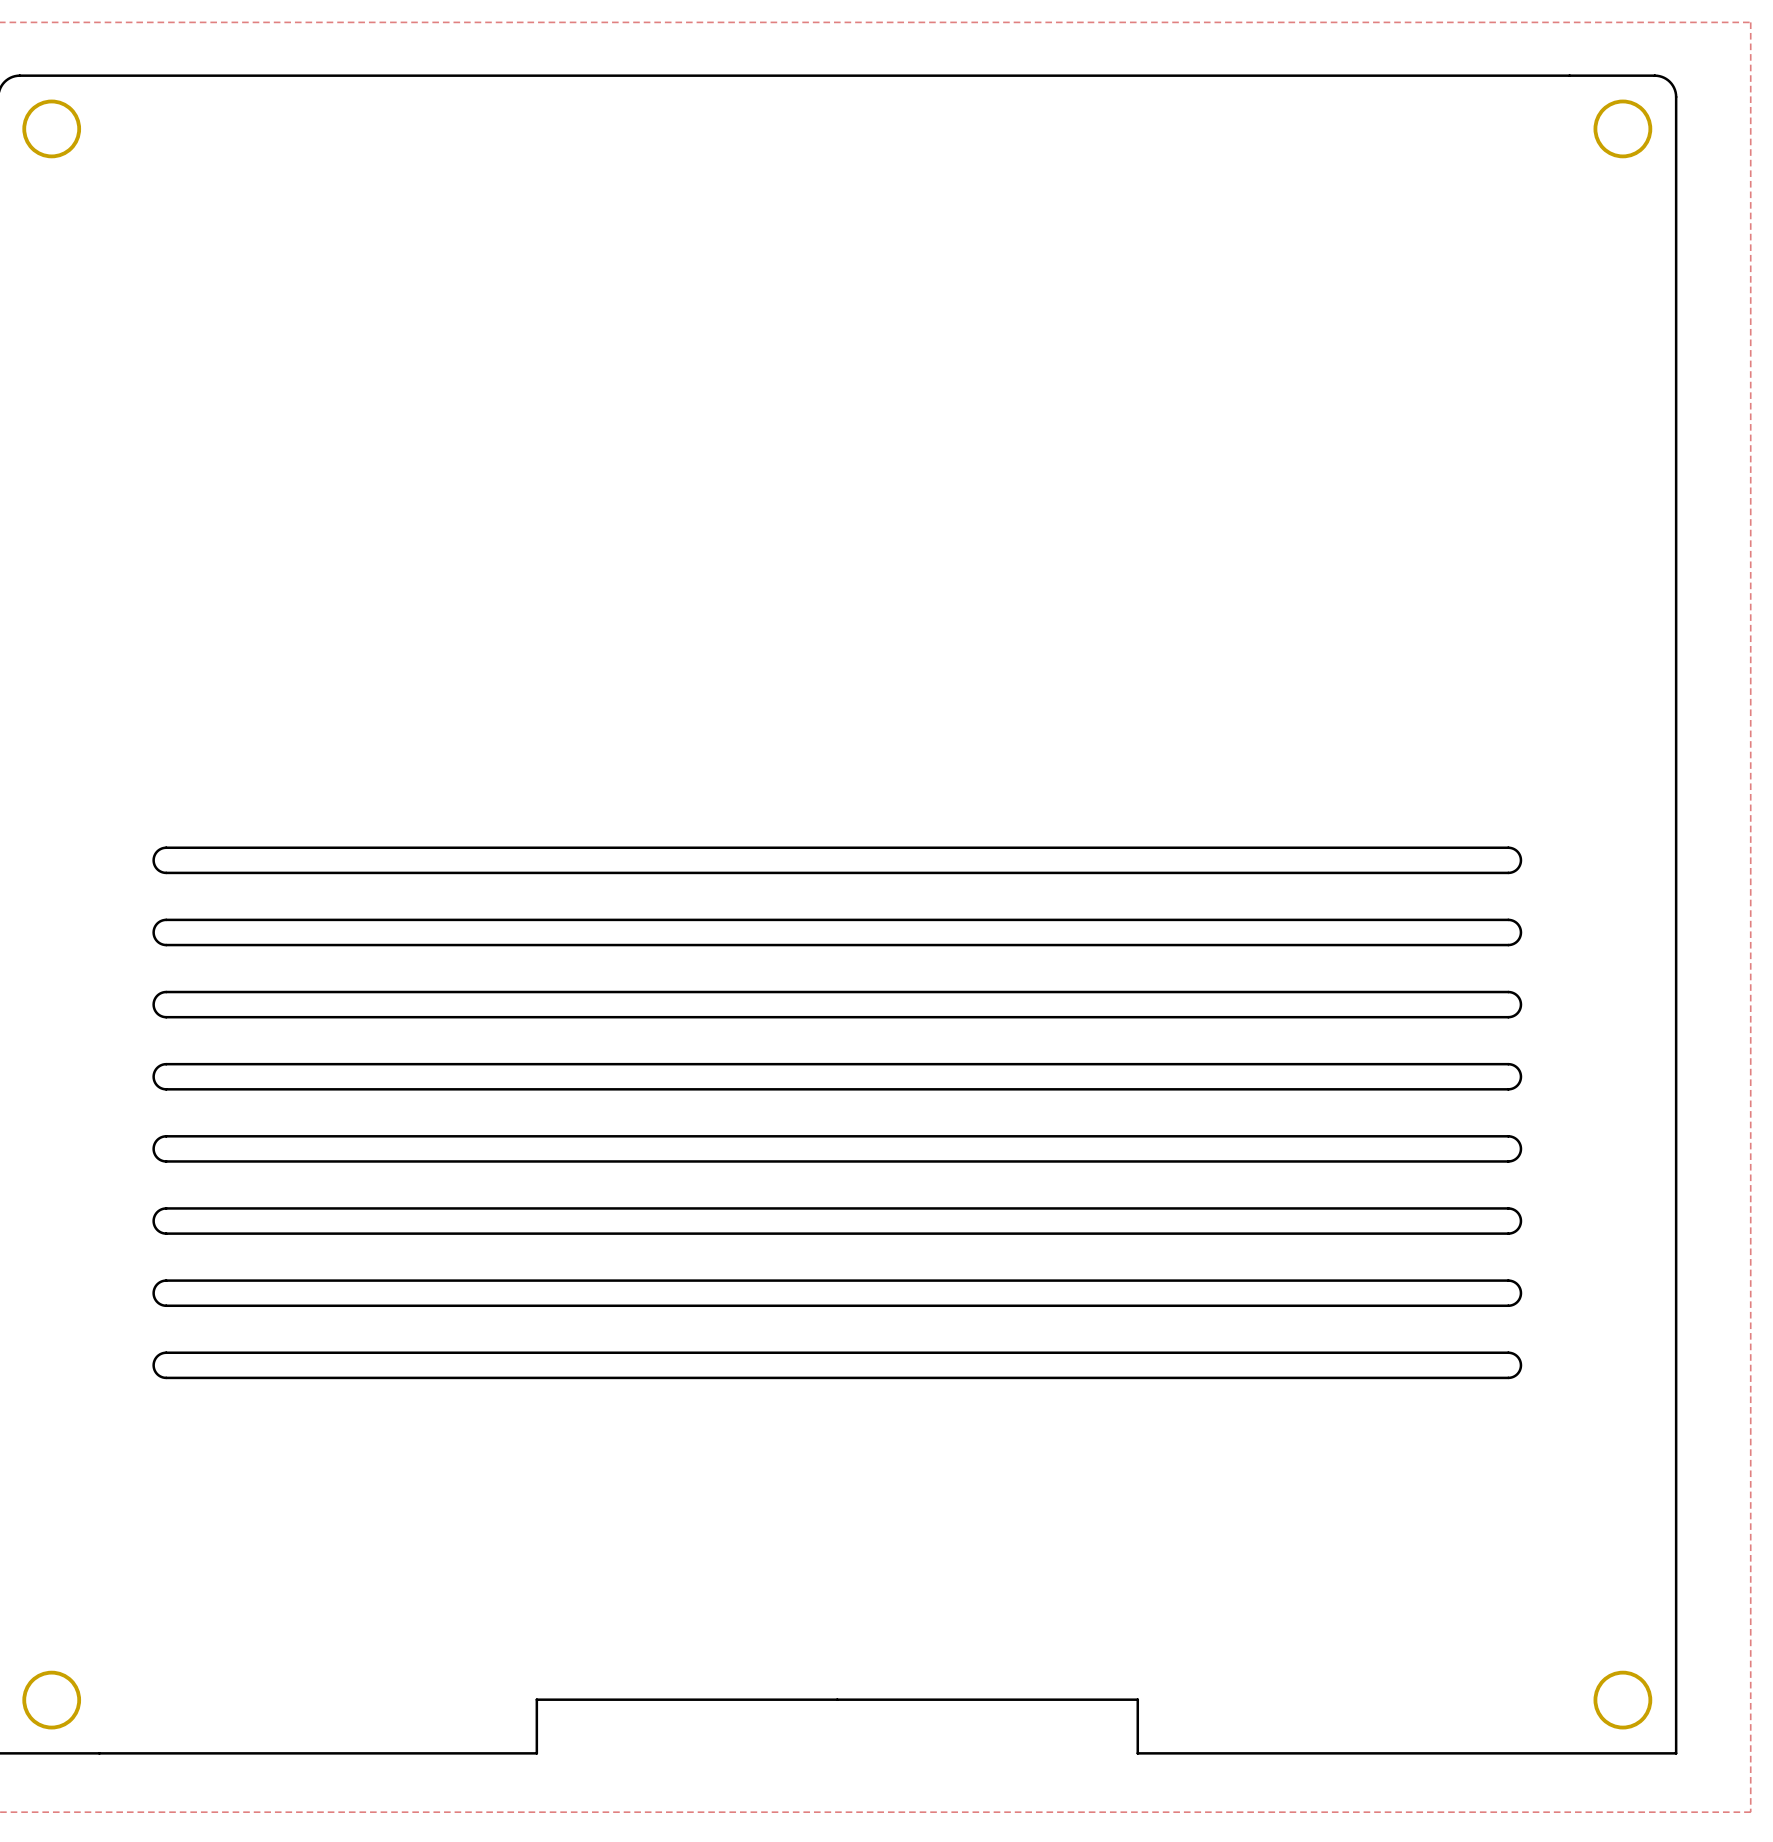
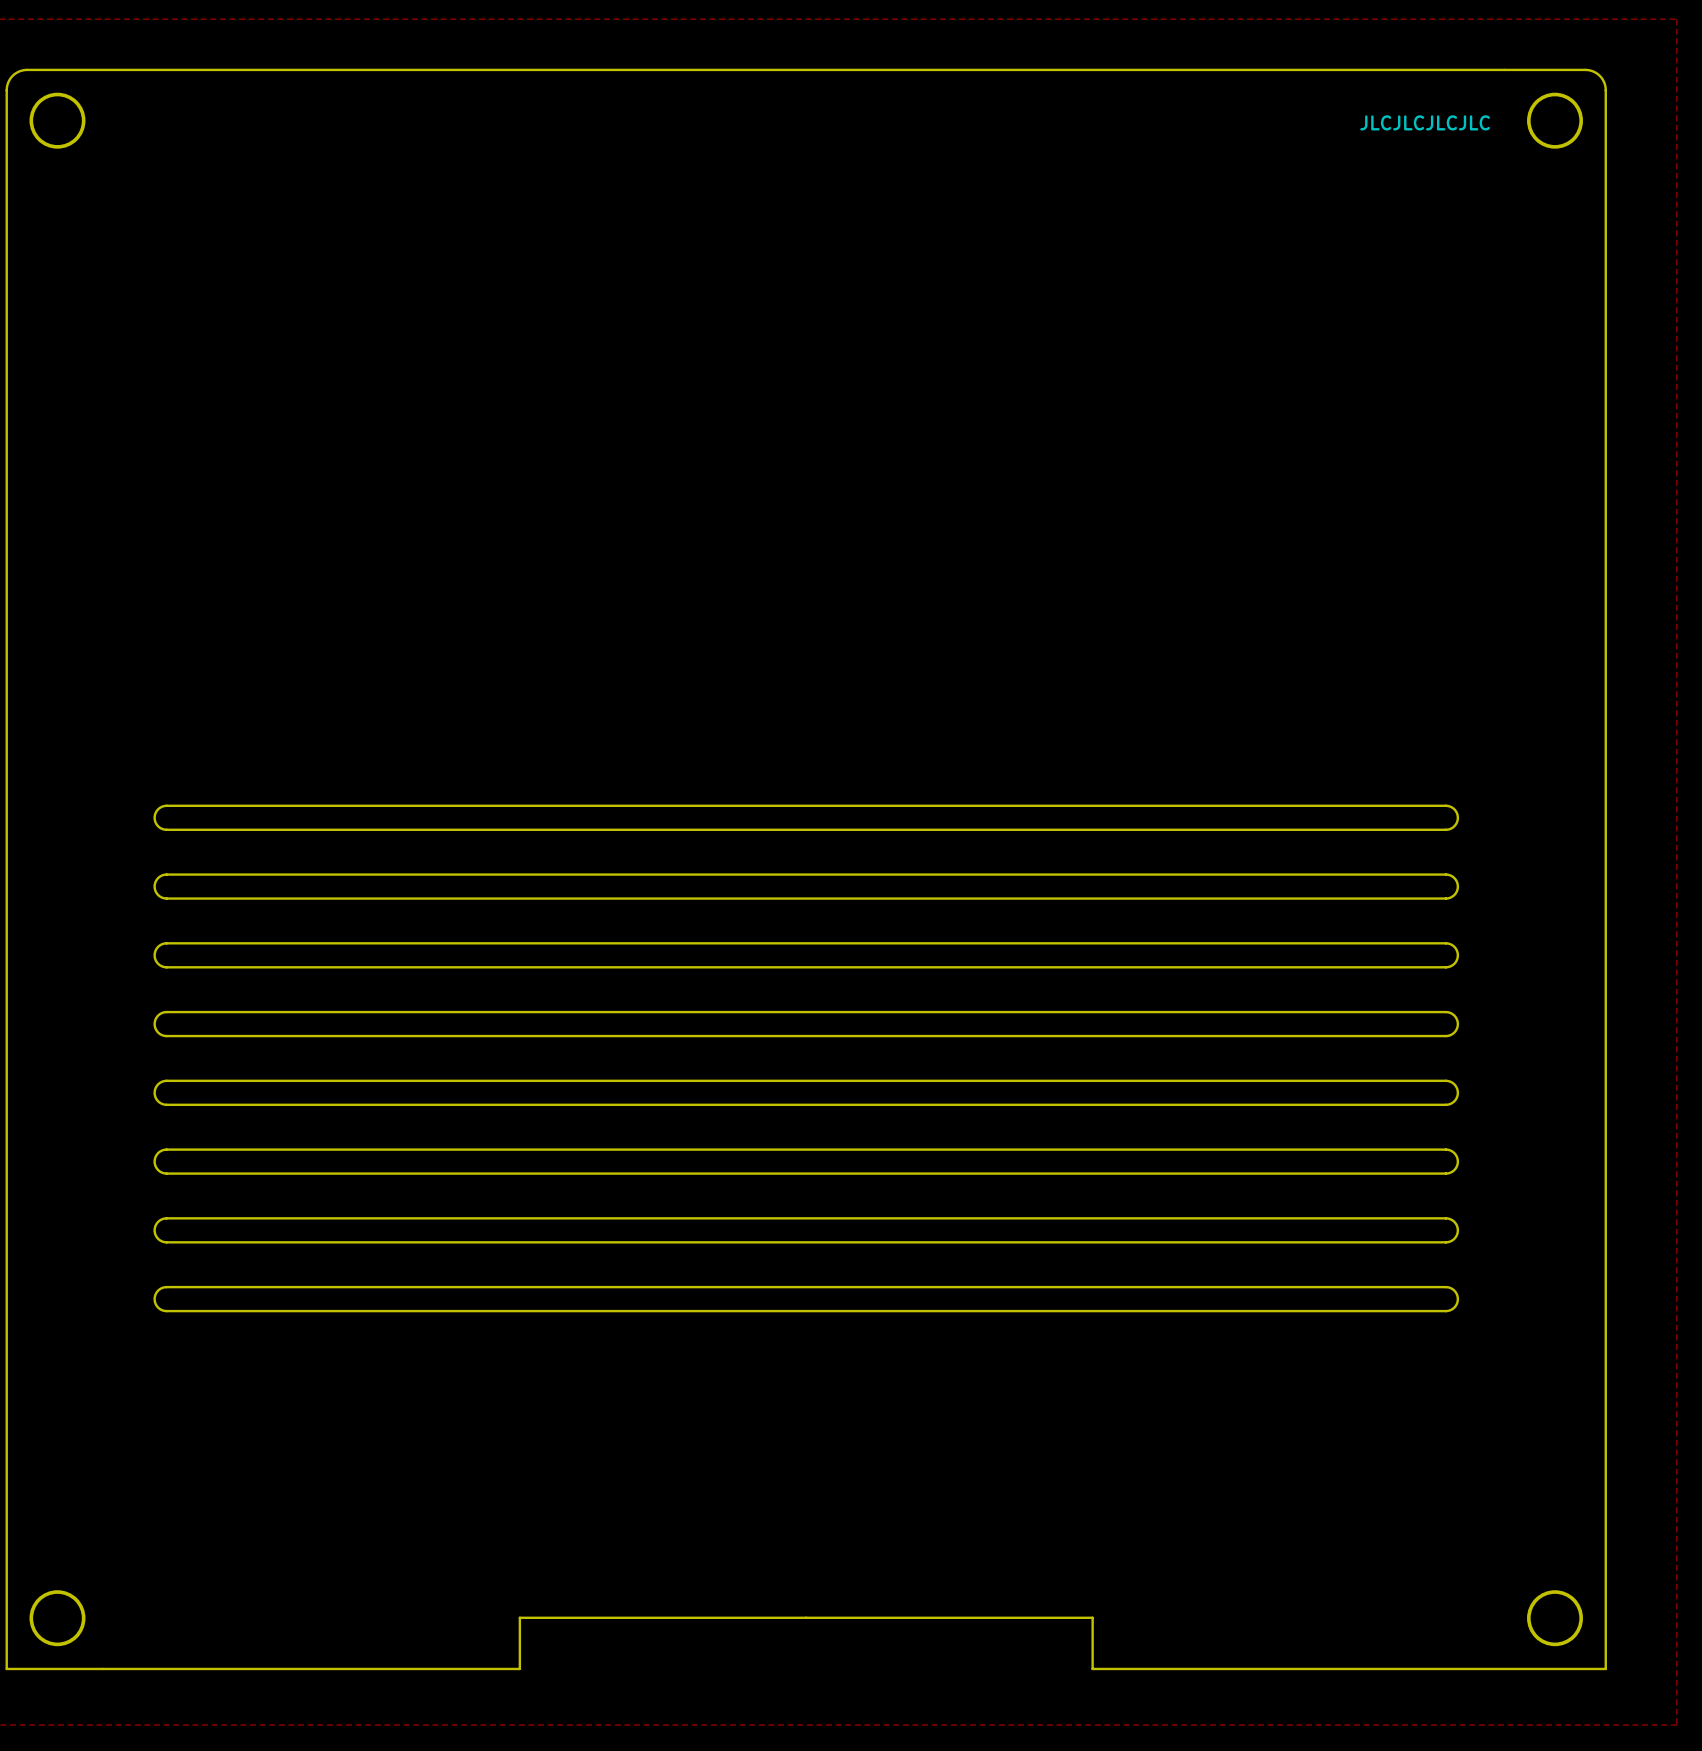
text: none -> JLCJLCJLCJLC (1425, 122)

